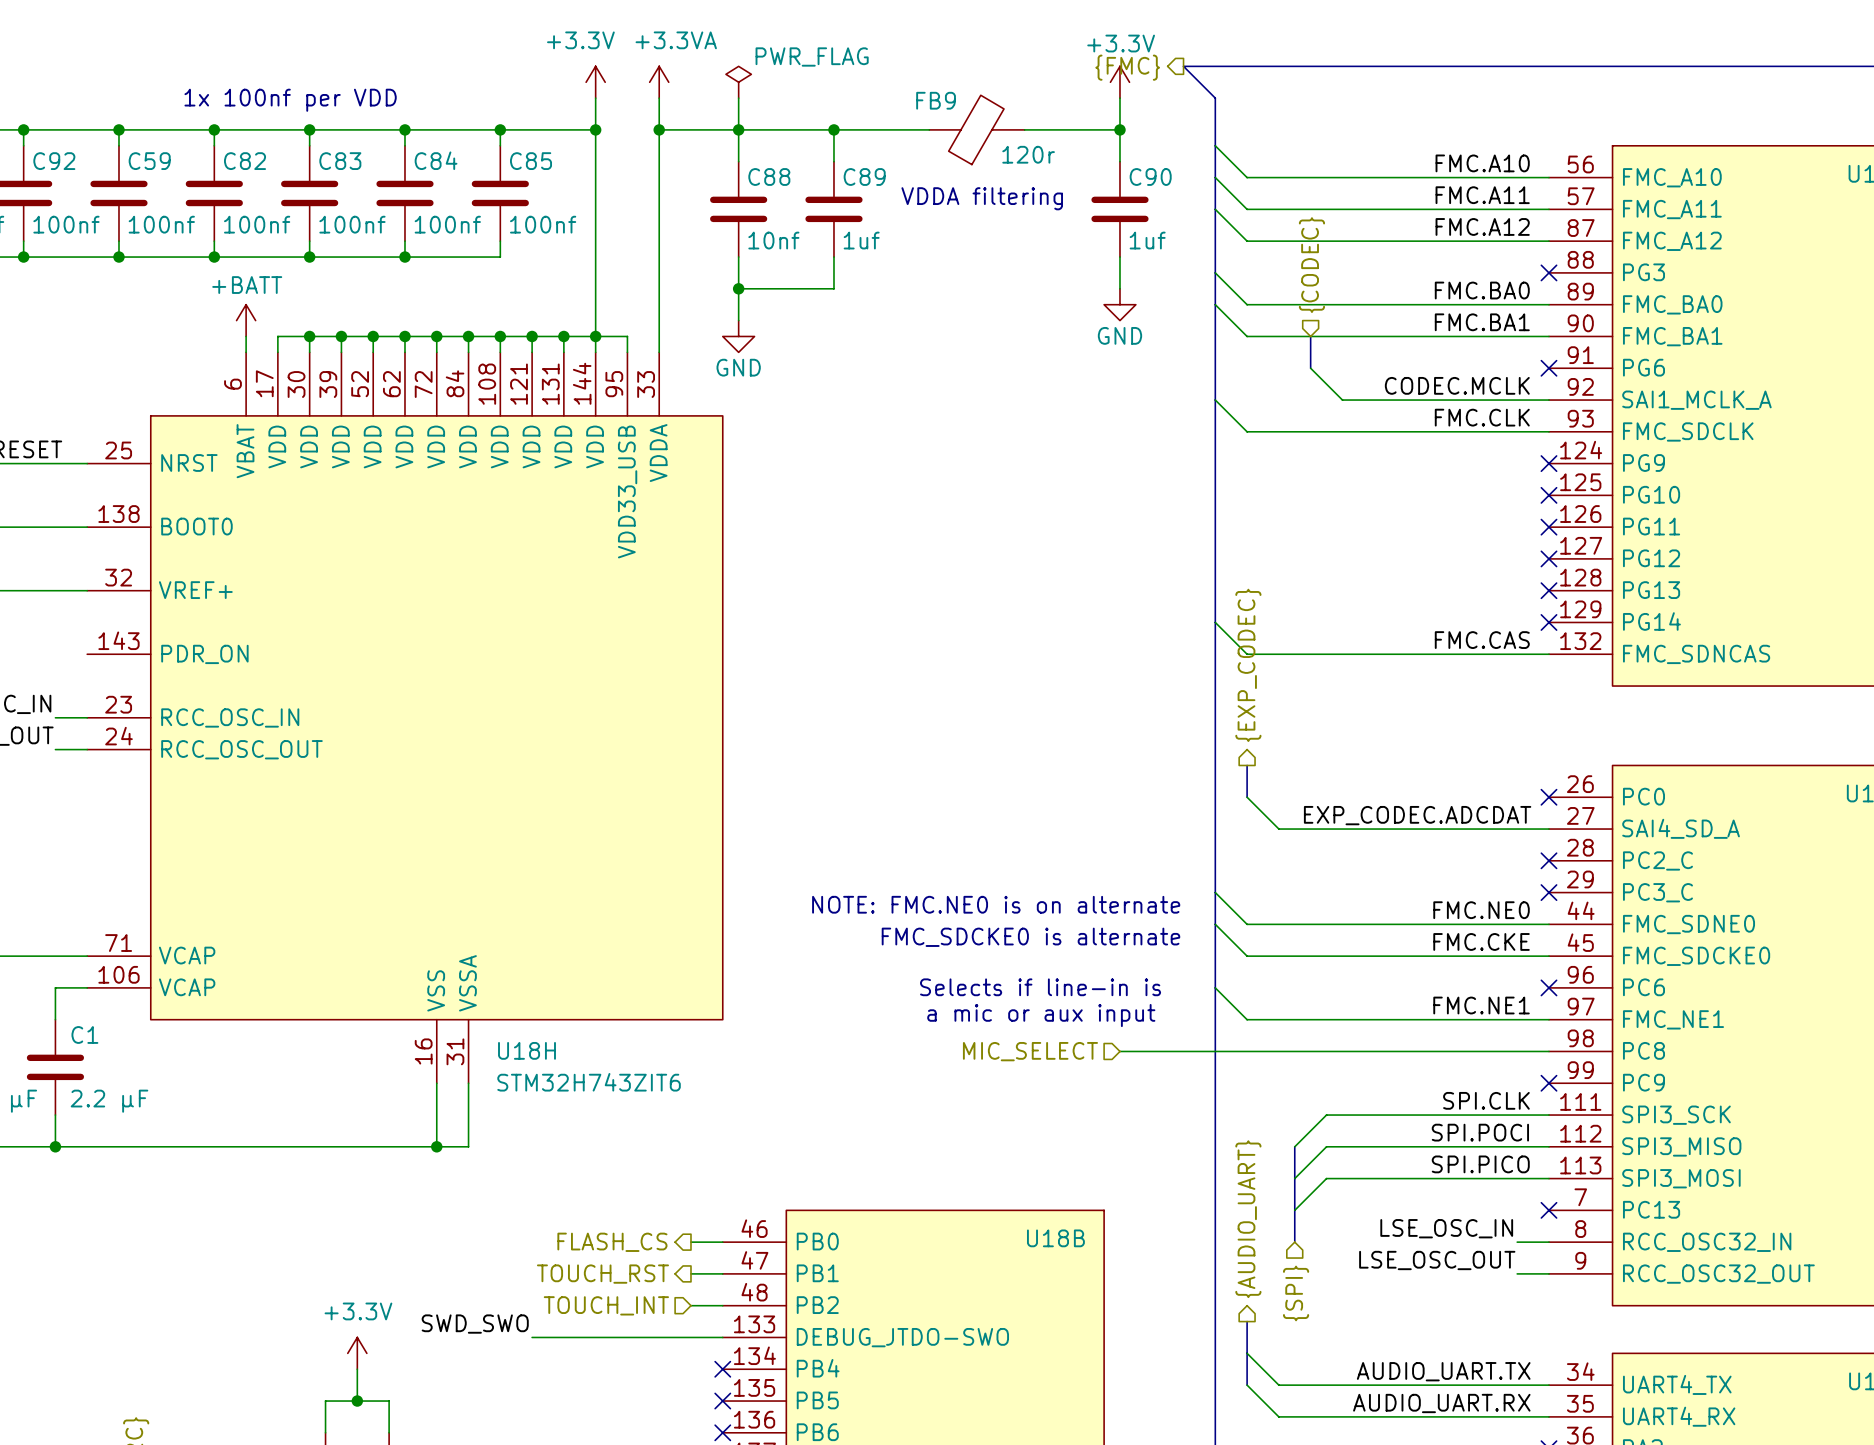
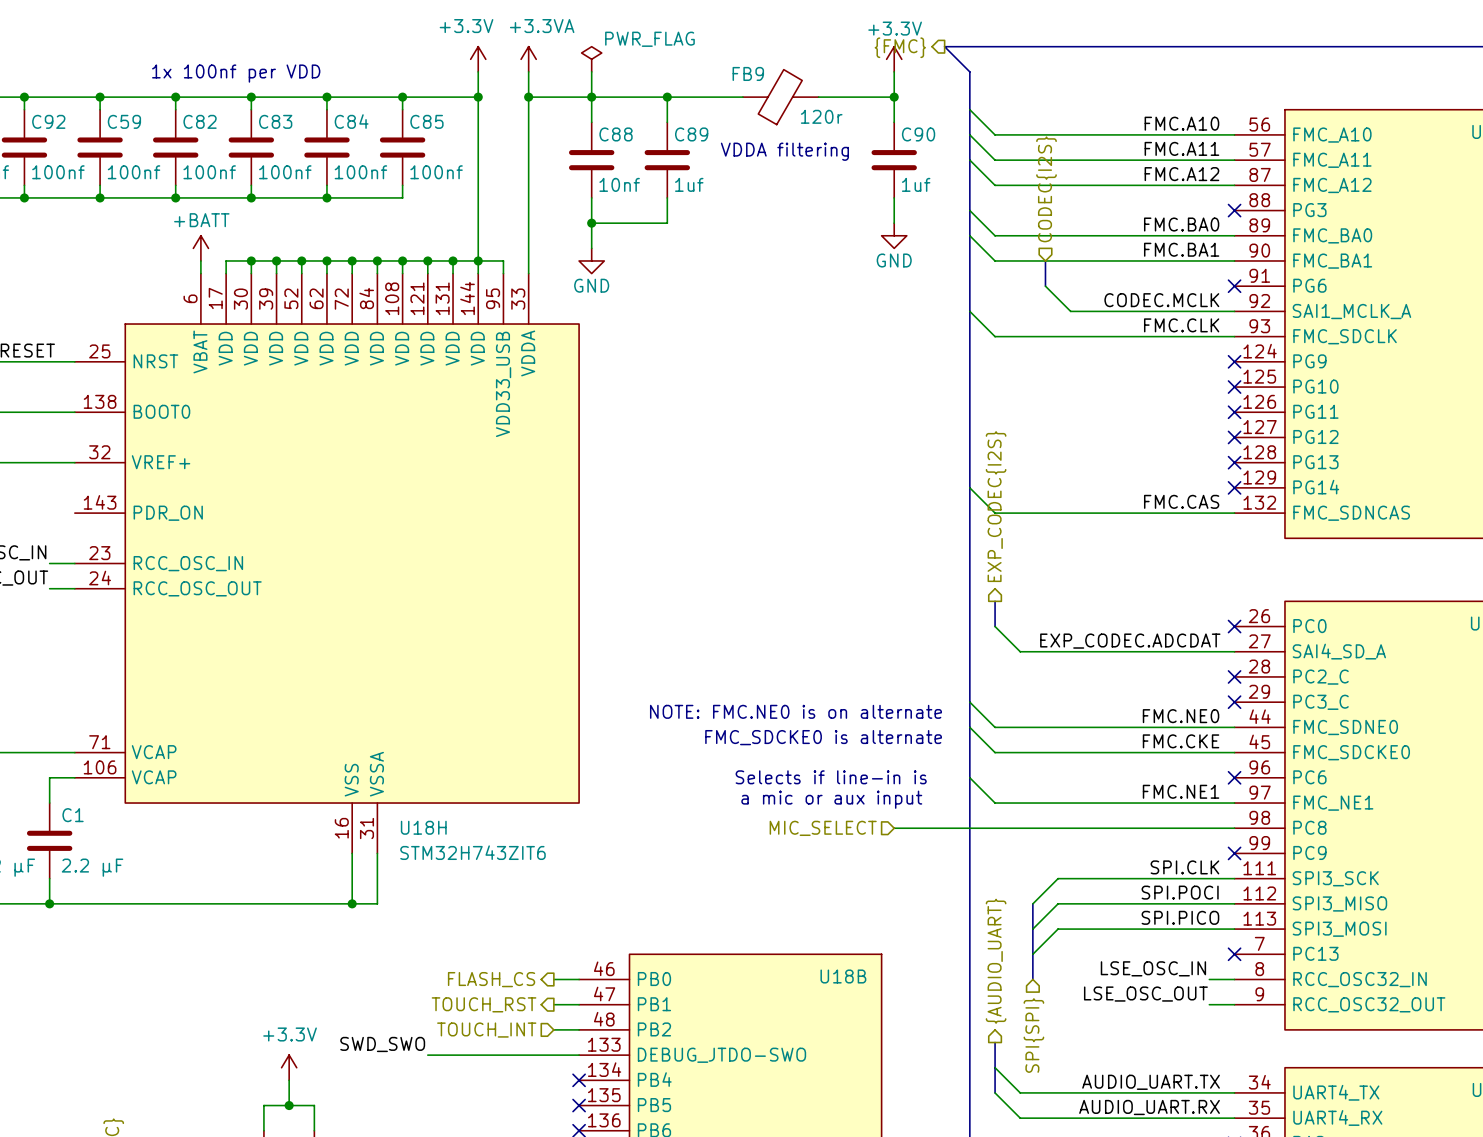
hierarchical label: {CODEC} (1311, 265) -> CODEC{I2S} (1046, 189)
hierarchical label: {EXP_CODEC} (1248, 665) -> EXP_CODEC{I2S} (996, 506)
hierarchical label: {SPI} (1296, 1293) -> SPI{SPI} (1033, 1035)

